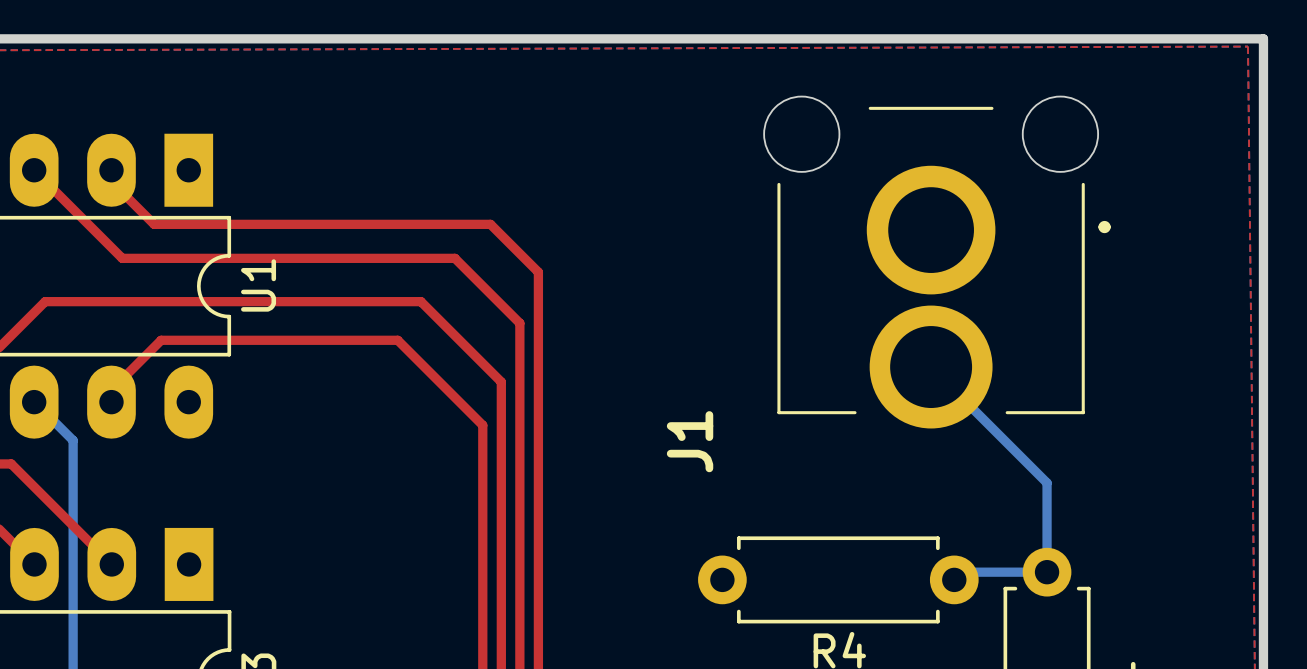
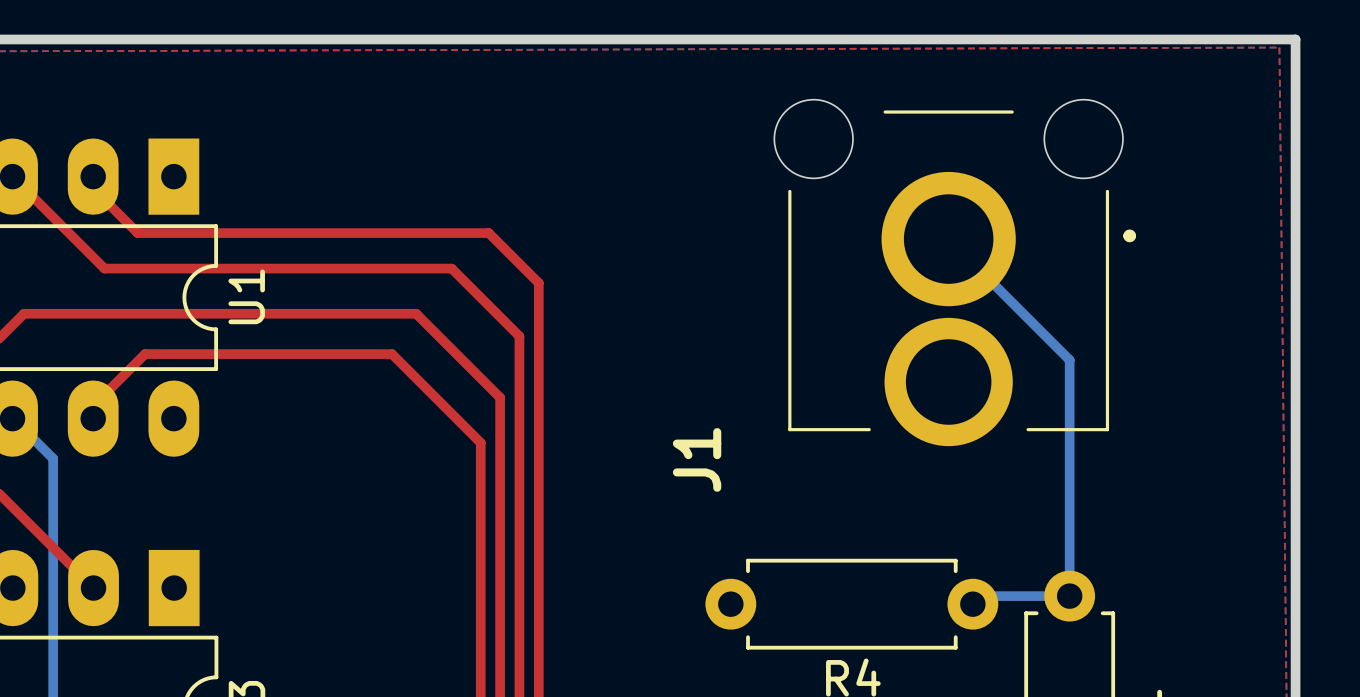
bottom track: (931, 367) (1047, 482) -> (948, 239) (1069, 360) (1069, 503)

